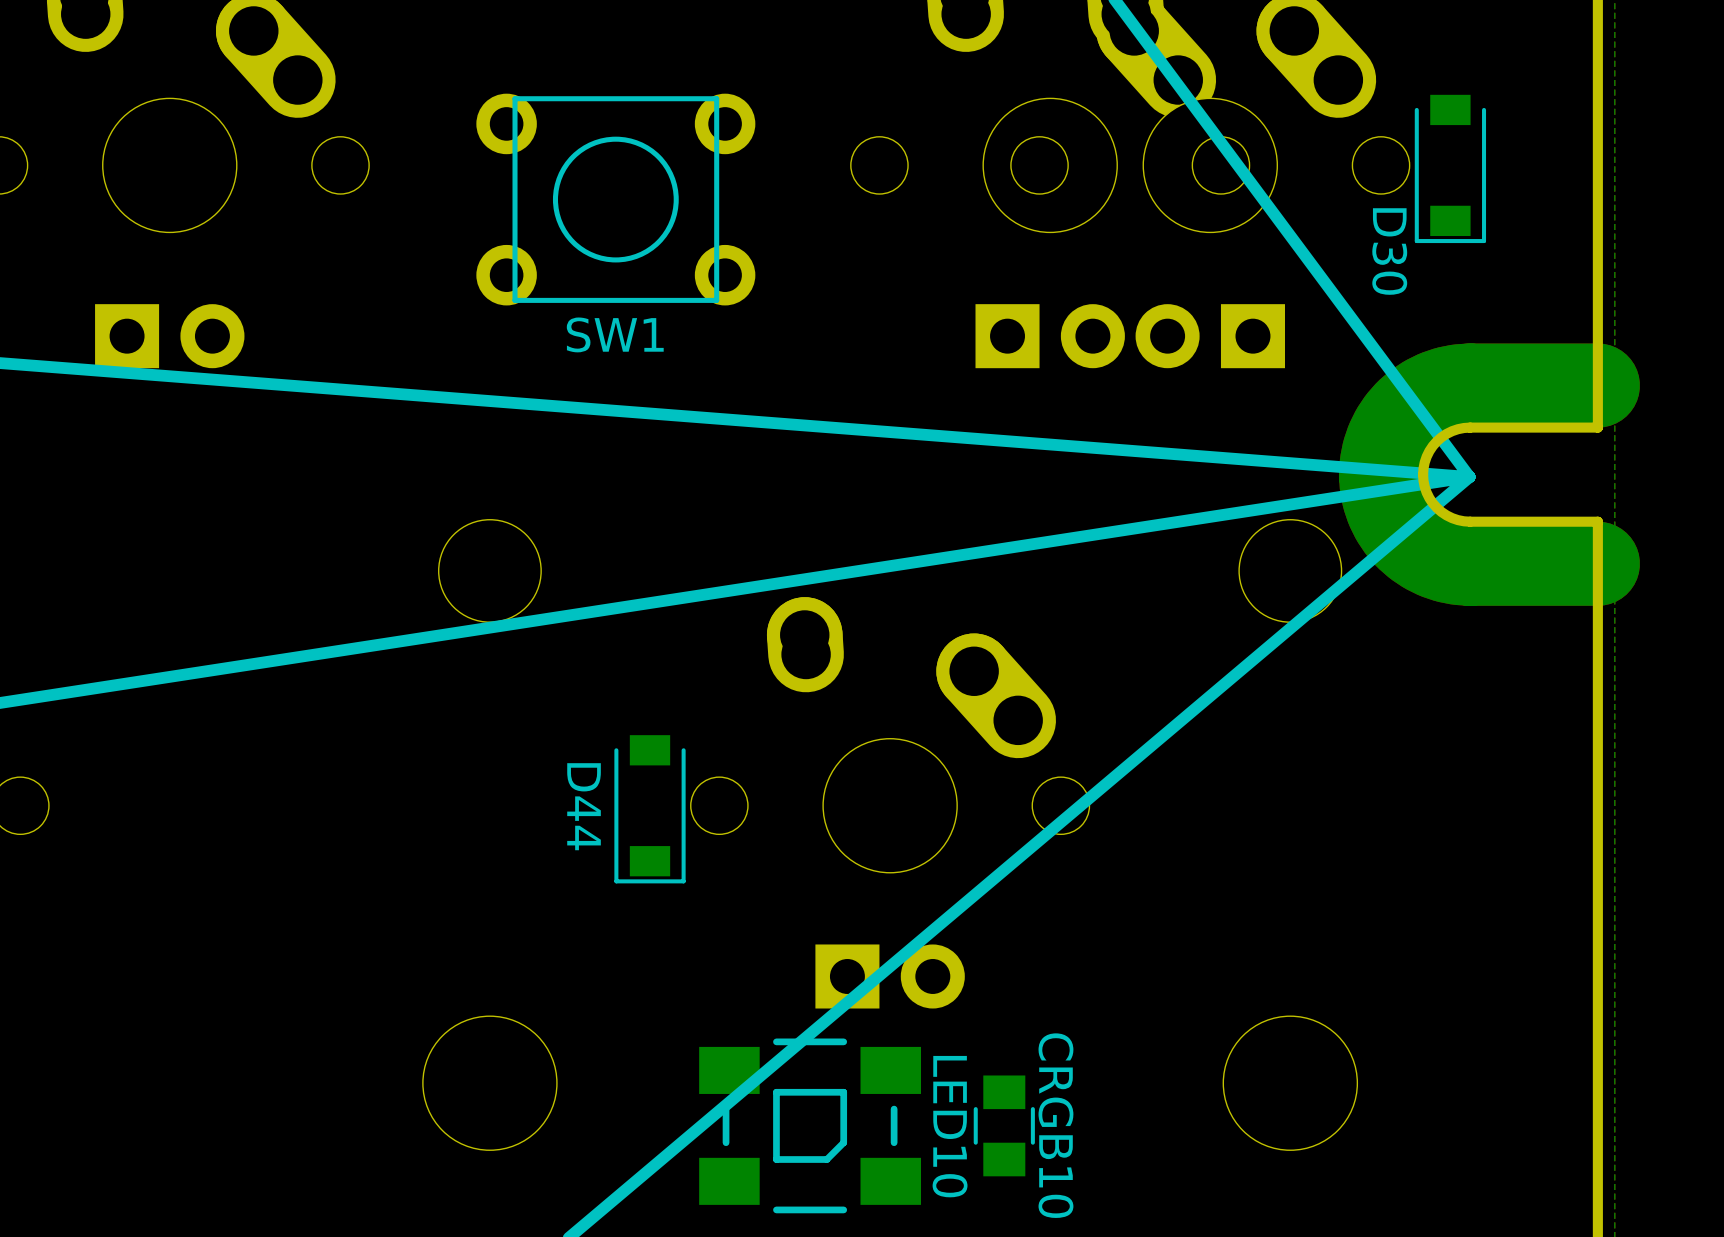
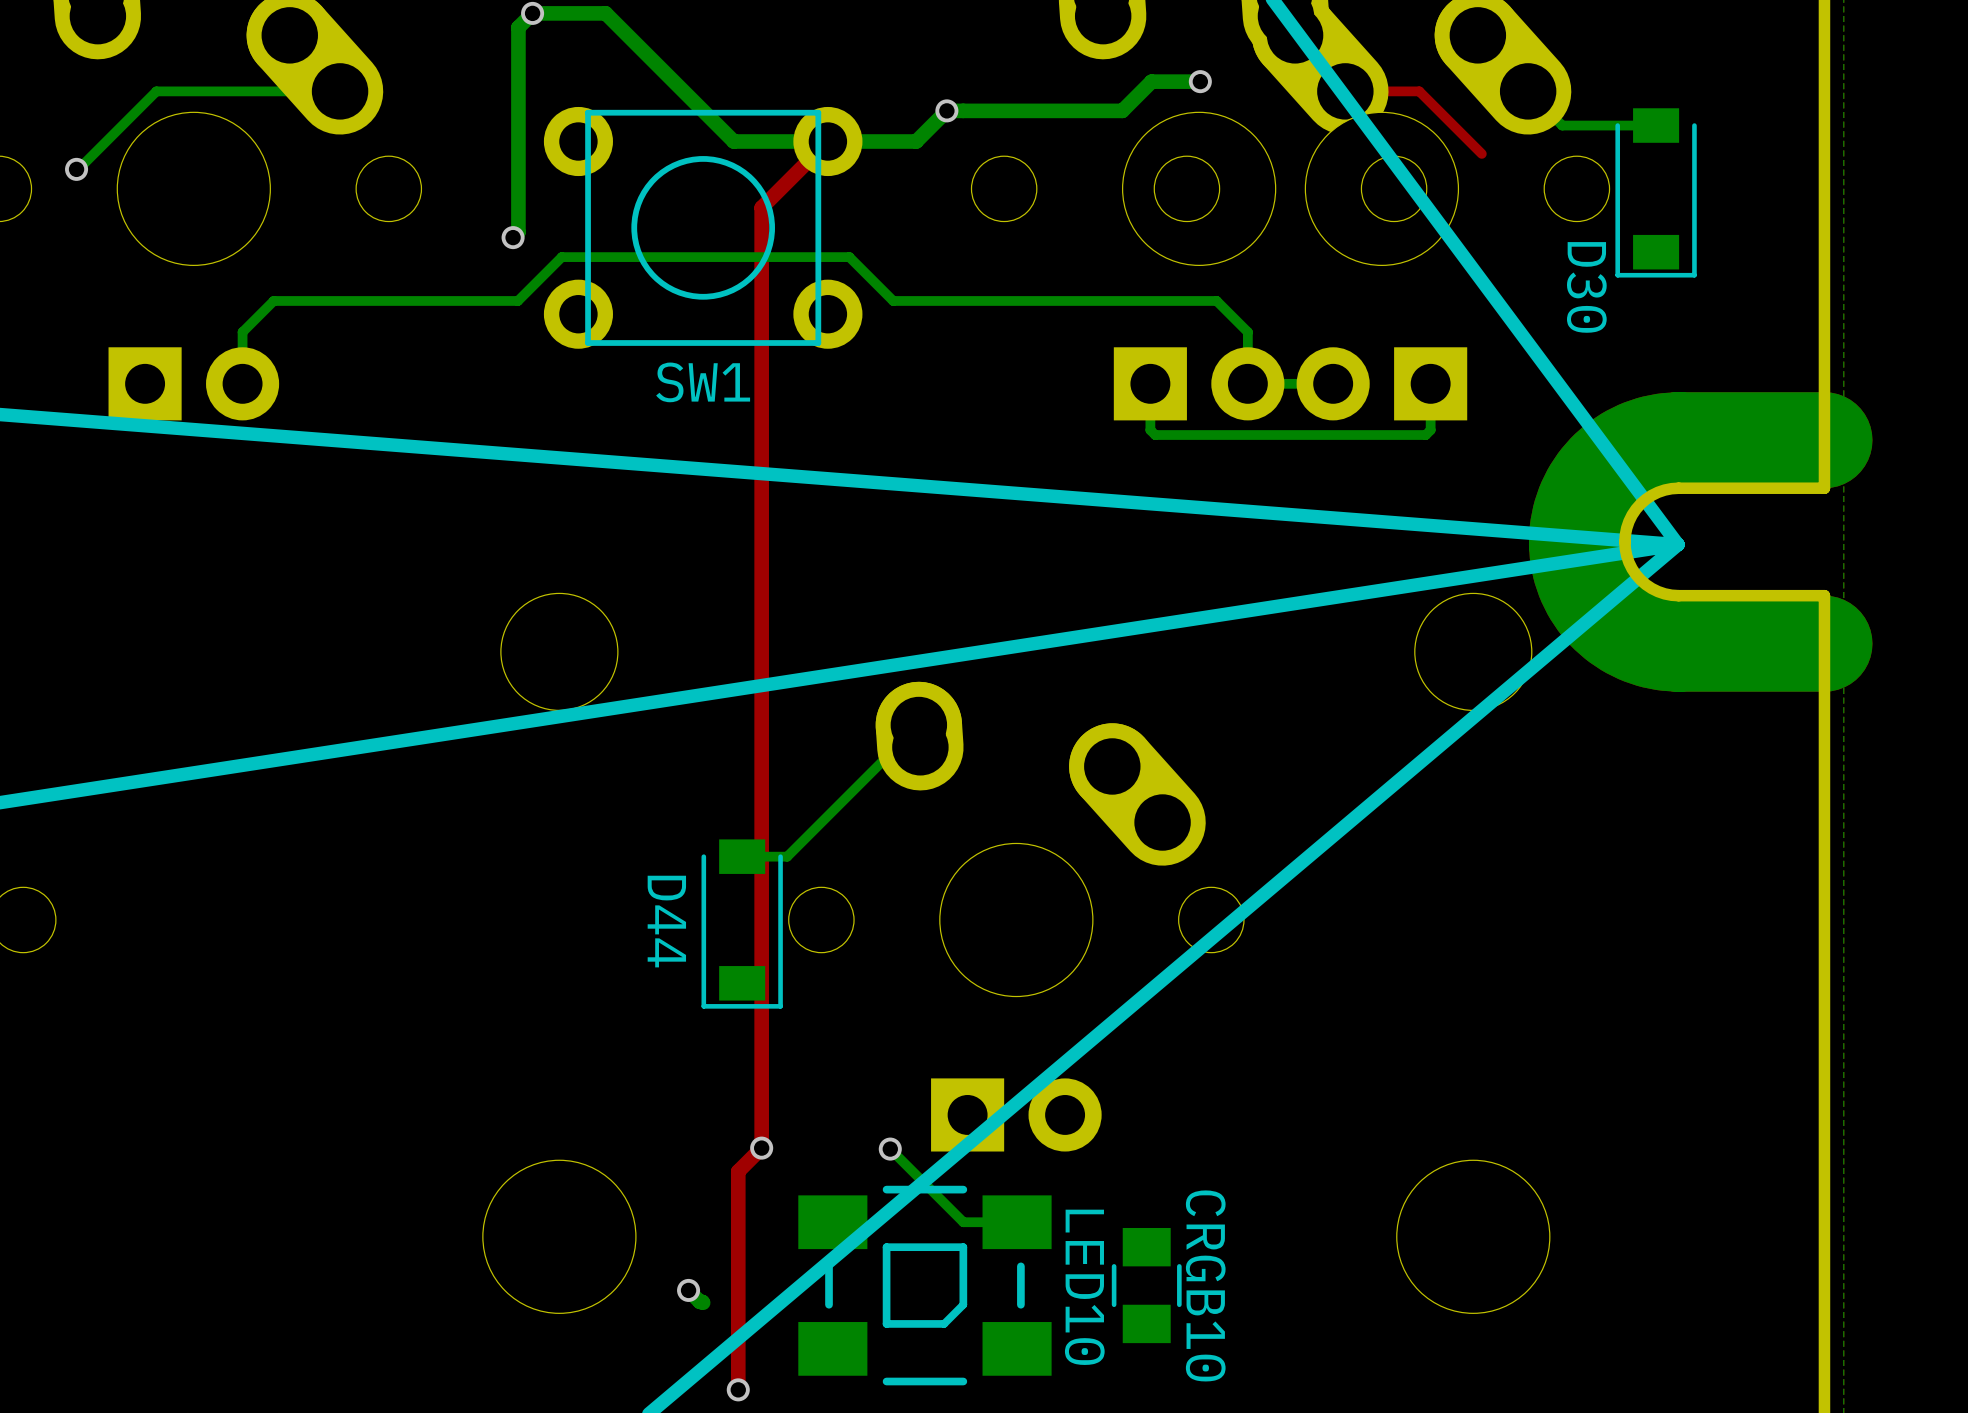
via: none -> (532, 13)
bottom track: none -> (1200, 81) (1151, 81) (1122, 110) (946, 110) (916, 141) (733, 141) (605, 13) (532, 13) (518, 27) (518, 232) (513, 237)
via: none -> (1200, 81)
bottom track: none -> (340, 91) (156, 91) (76, 169)
top track: none -> (1345, 91) (1419, 91) (1481, 153)
bottom track: none -> (1528, 91) (1562, 125) (1656, 125)
via: none -> (946, 110)
top track: none -> (827, 141) (761, 207) (761, 1148) (738, 1171) (738, 1389)
via: none -> (76, 169)
via: none -> (513, 237)
bottom track: none -> (1333, 383) (1247, 383) (1247, 332) (1216, 300) (893, 300) (849, 257) (561, 257) (517, 300) (273, 300) (242, 332) (242, 383)
bottom track: none -> (1430, 383) (1430, 430) (1425, 435) (1155, 435) (1150, 430) (1150, 383)
bottom track: none -> (918, 725) (787, 856) (742, 856)
via: none -> (761, 1148)
bottom track: none -> (890, 1149) (963, 1222) (1017, 1222)
via: none -> (890, 1149)
bottom track: none -> (688, 1290) (703, 1302)
via: none -> (688, 1290)
via: none -> (738, 1389)

